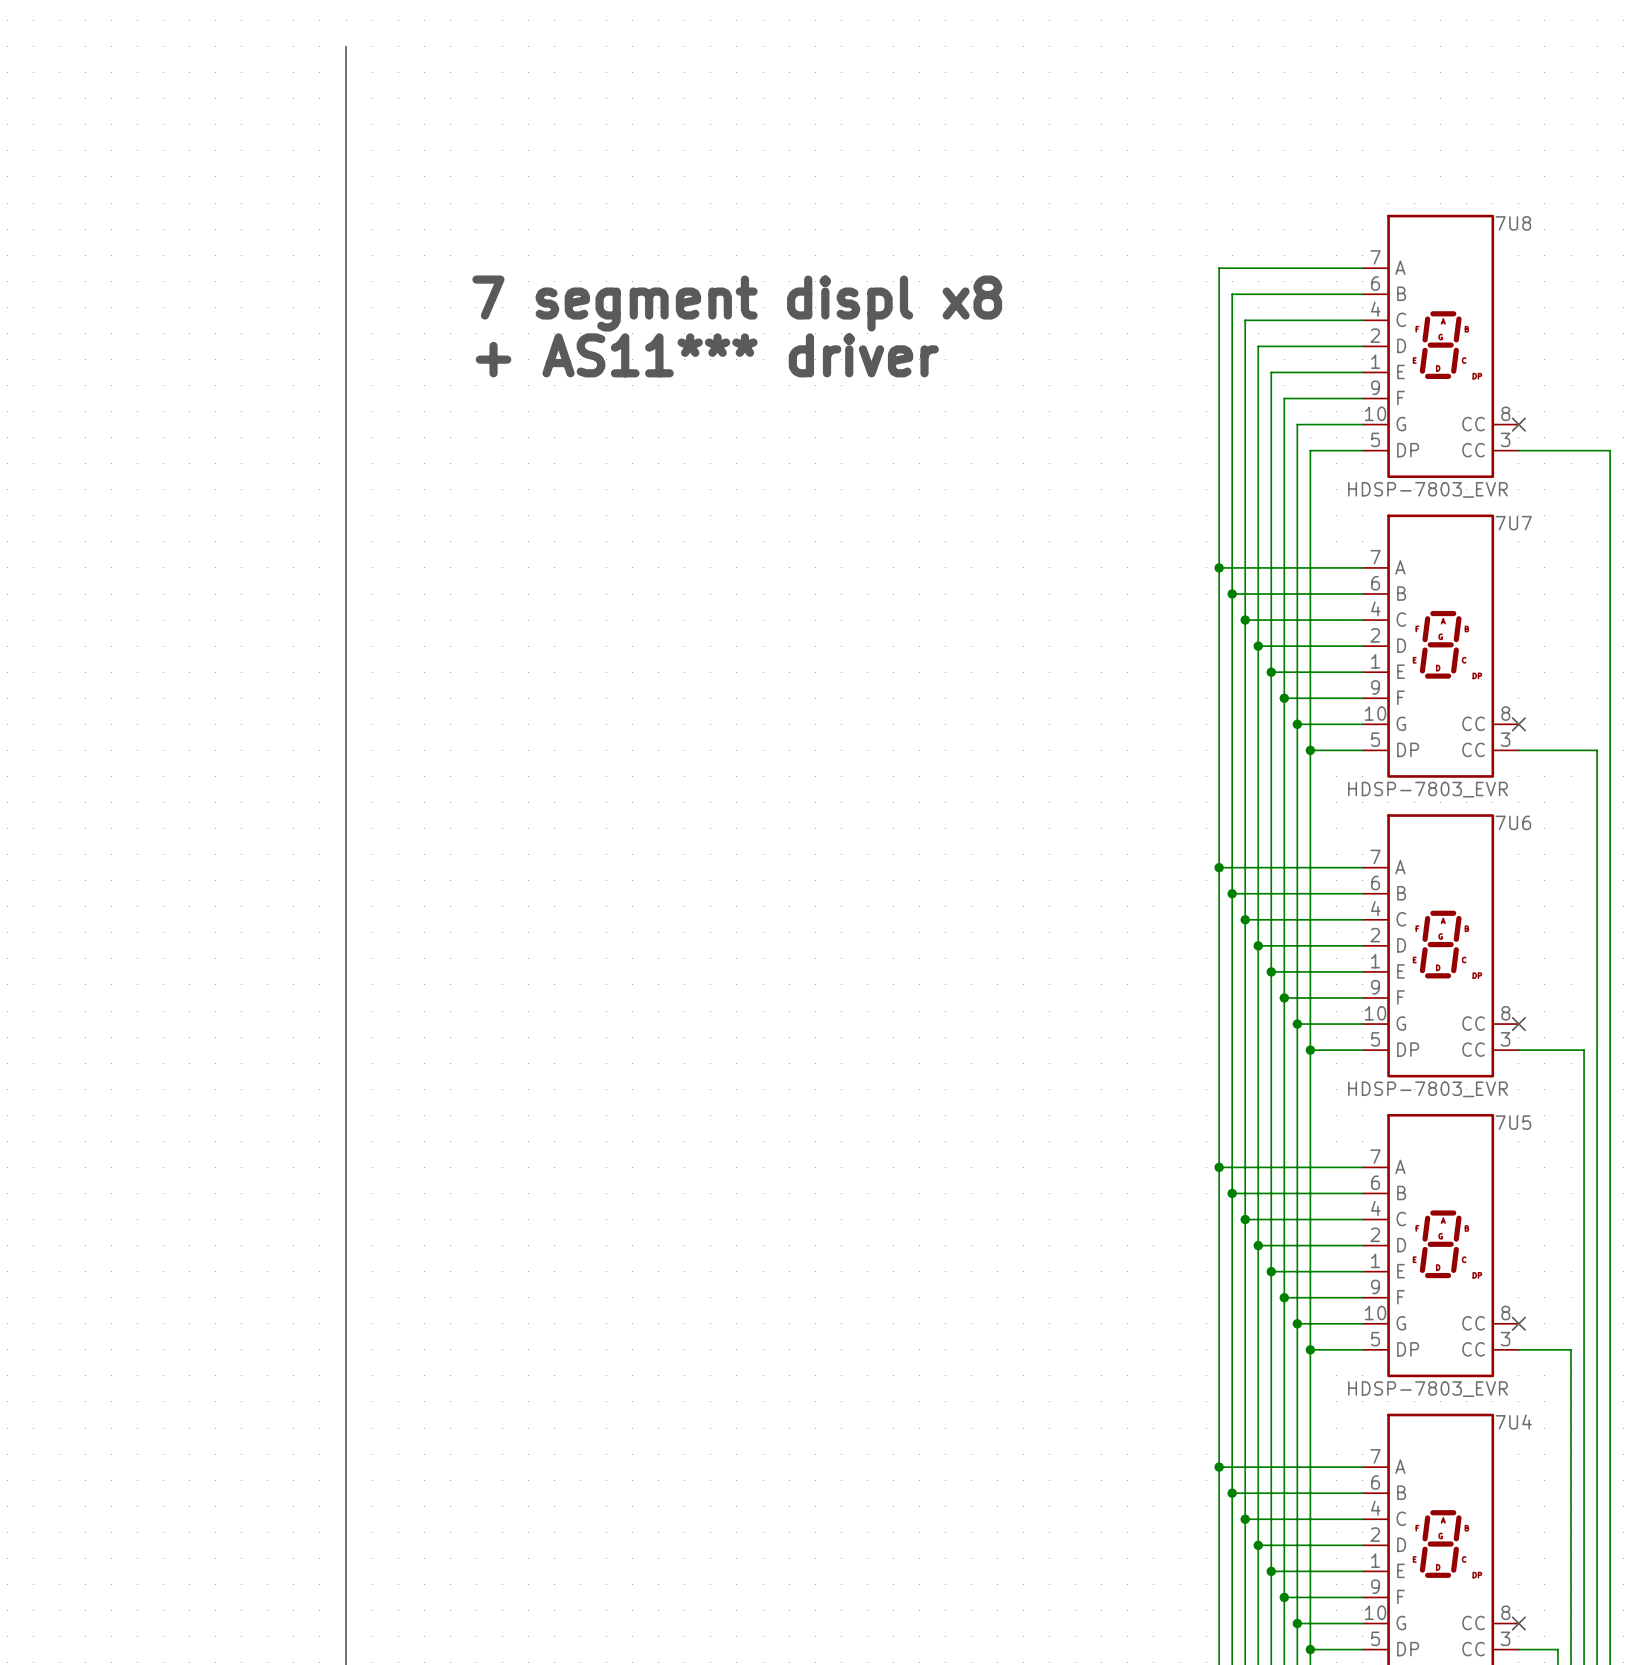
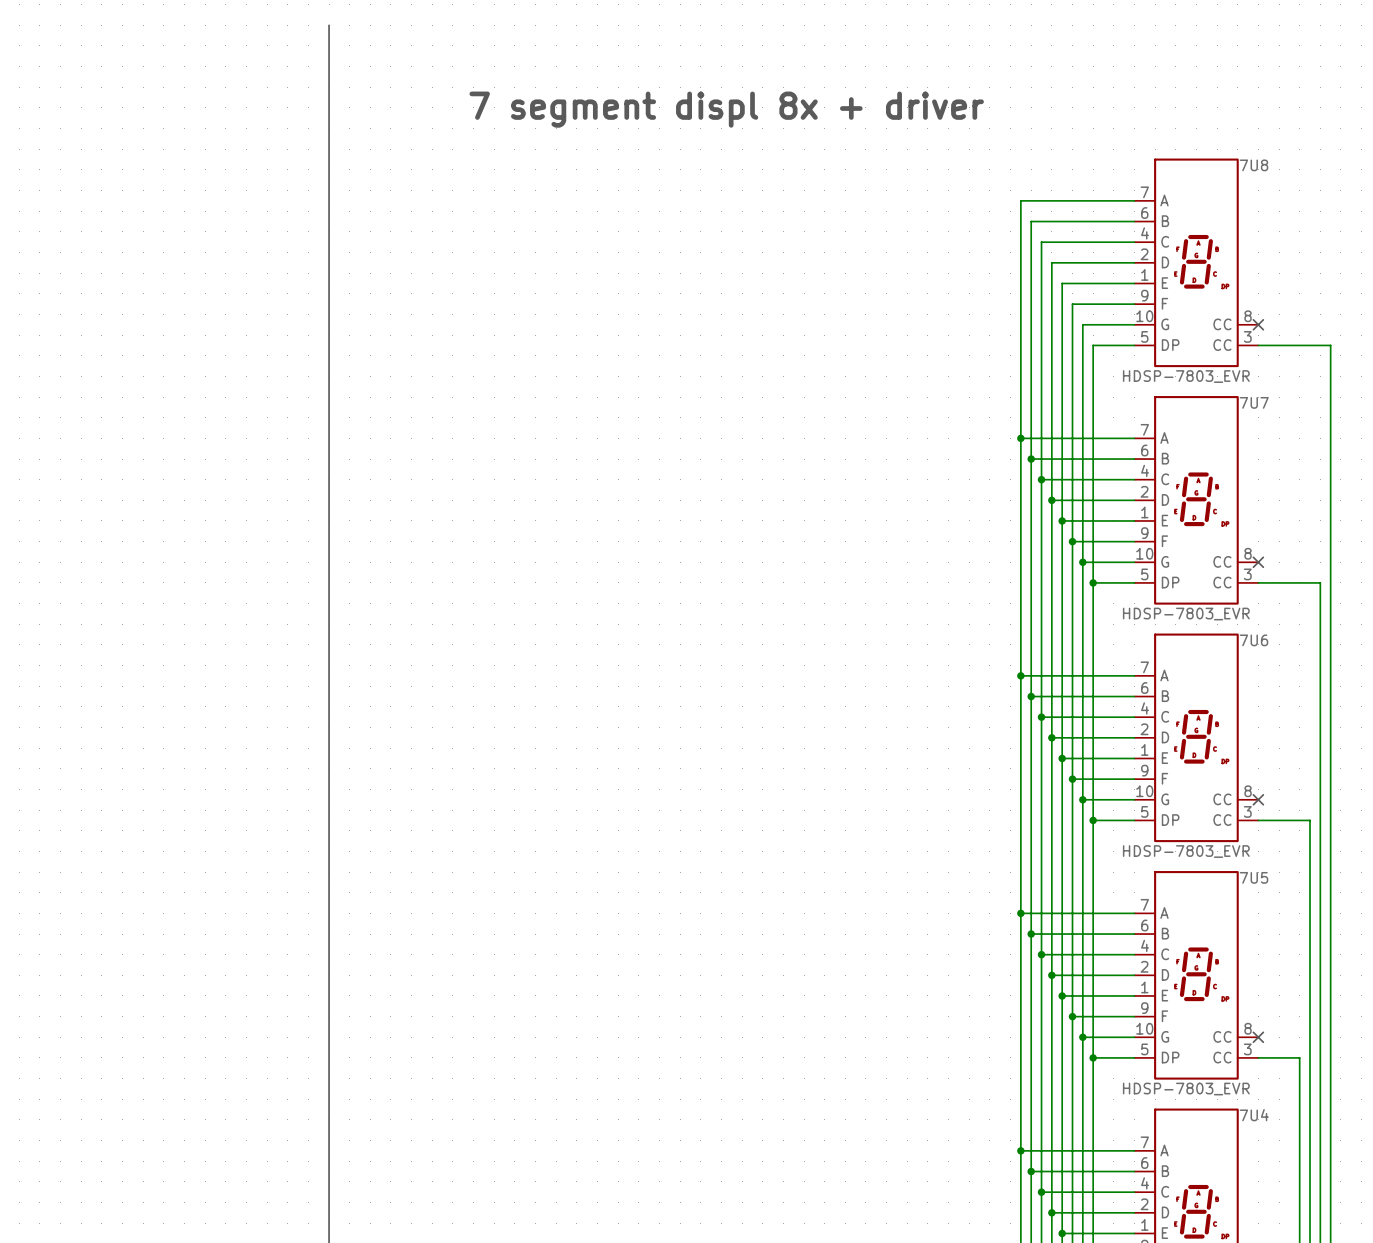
text: none -> 7 segment displ 8x + driver (726, 109)
text: 7 segment displ x8 (737, 303) -> none
text: + AS11*** driver (707, 355) -> none

